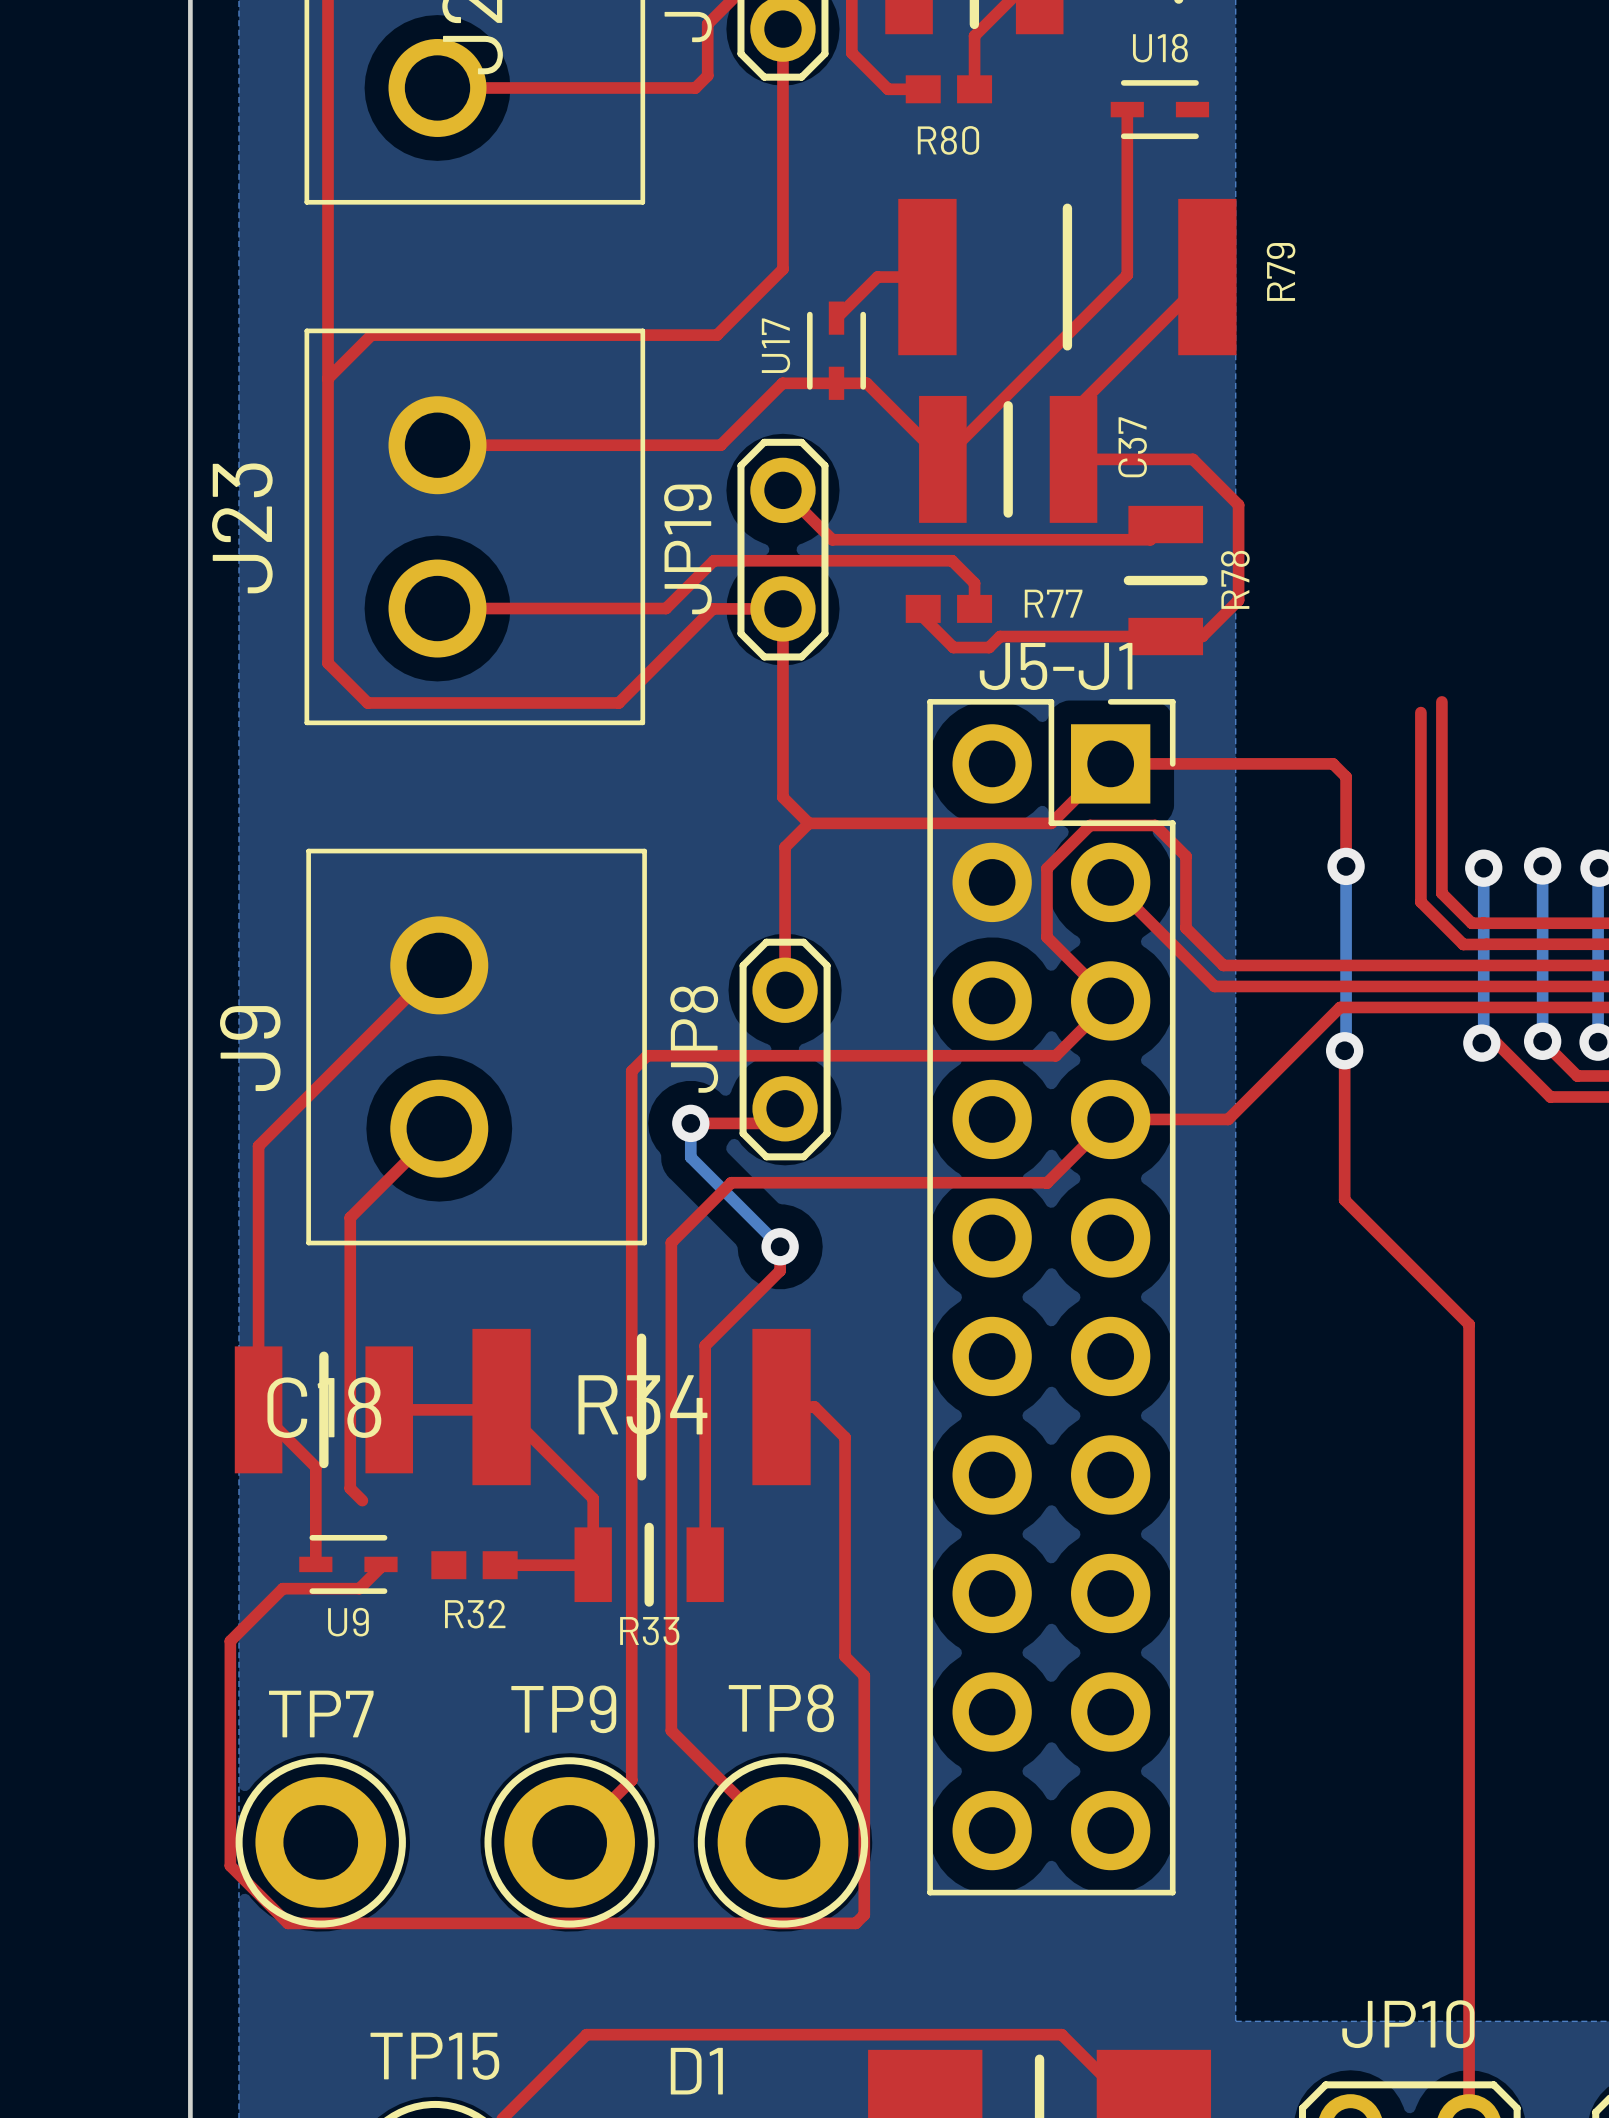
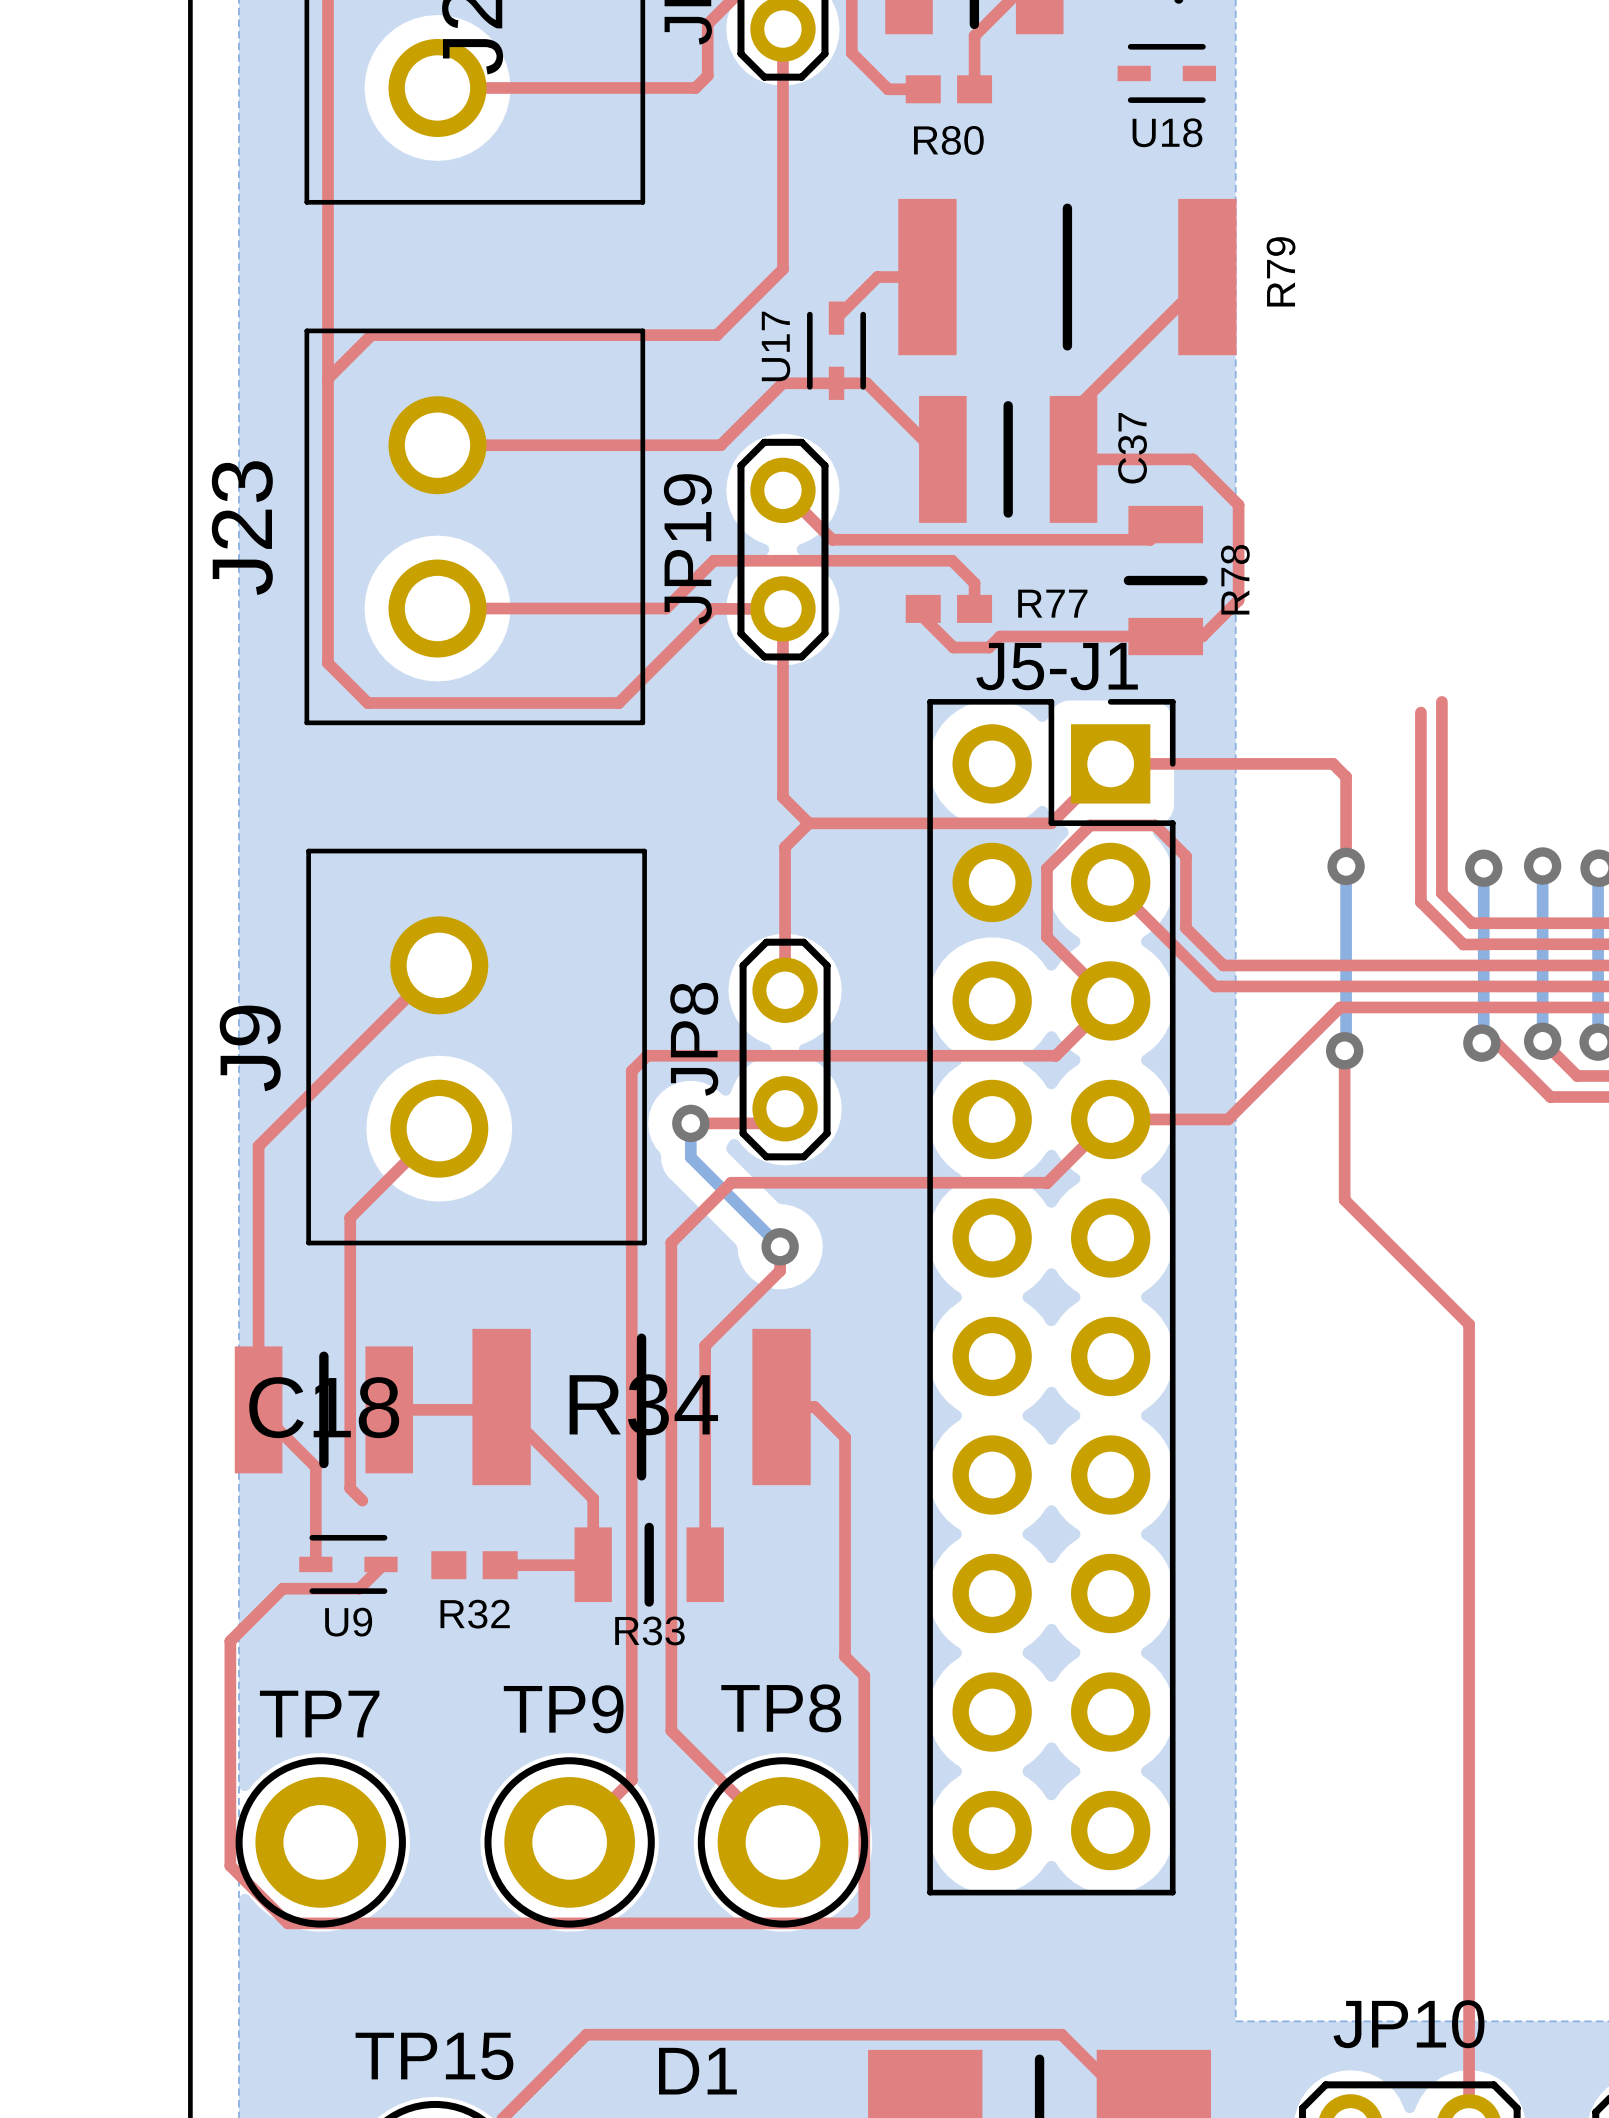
U18 name position: U18 (1160, 48) -> U18 (1167, 132)
top track: (1127, 109) (1127, 274) (942, 459) -> none
U18 position: (1159, 109) -> (1166, 73)

